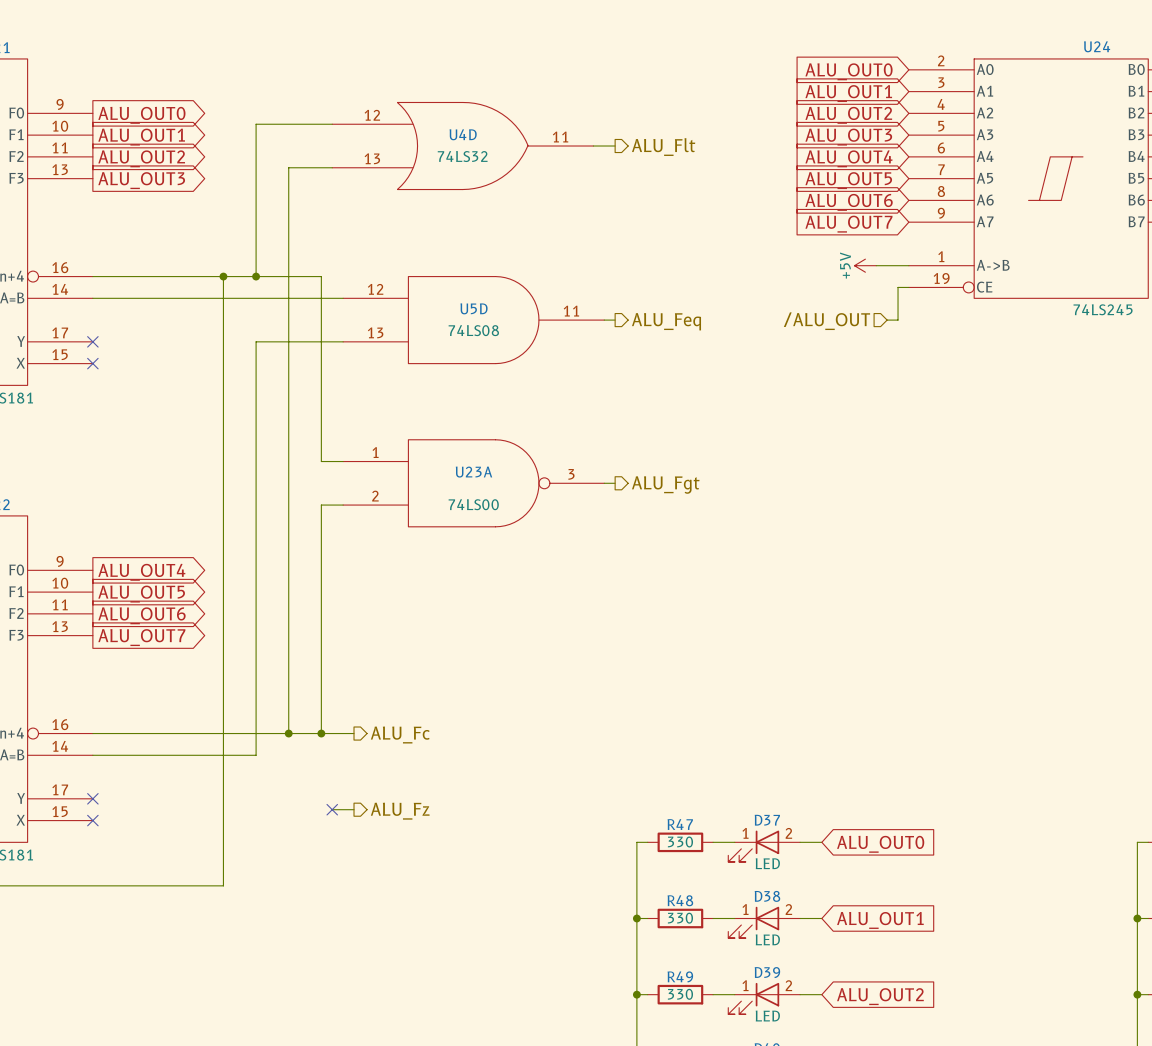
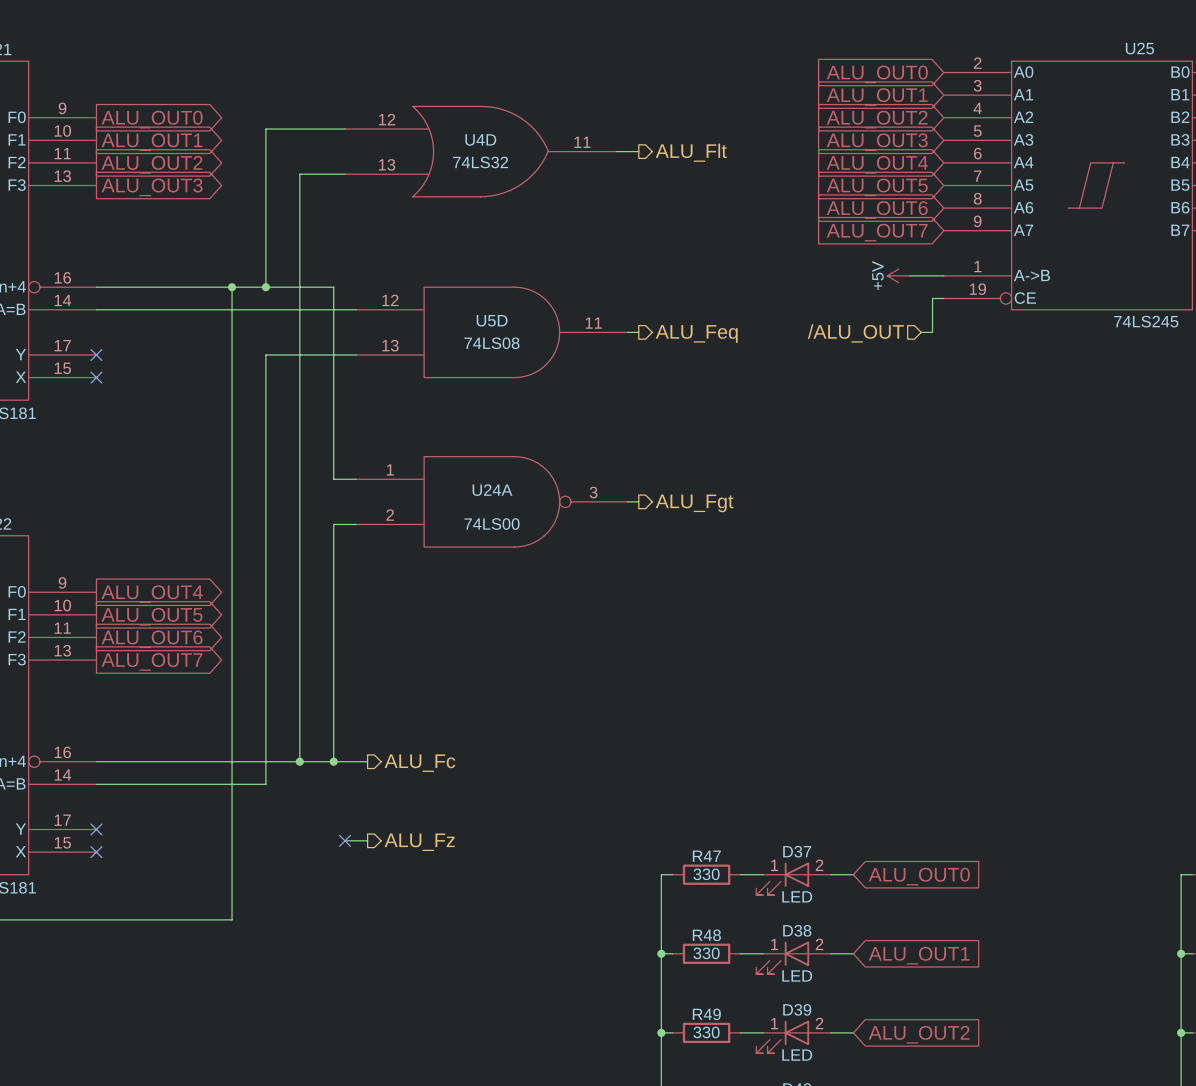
U24 name: U24 (1097, 46) -> U25 (1139, 48)
U23A name: U23A (473, 472) -> U24A (492, 490)

